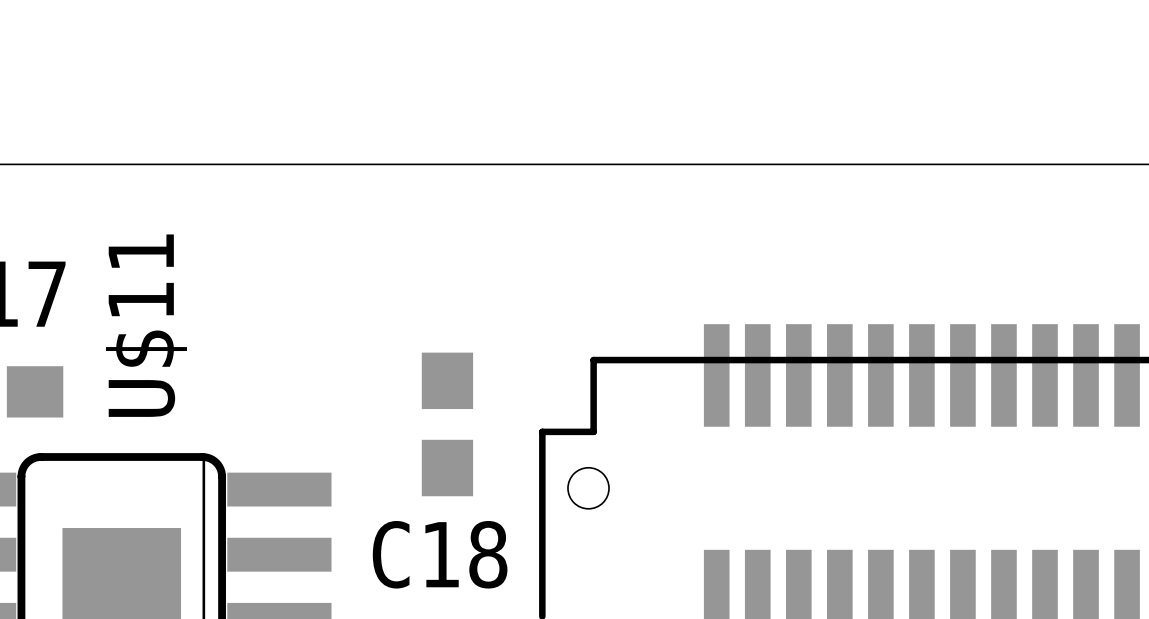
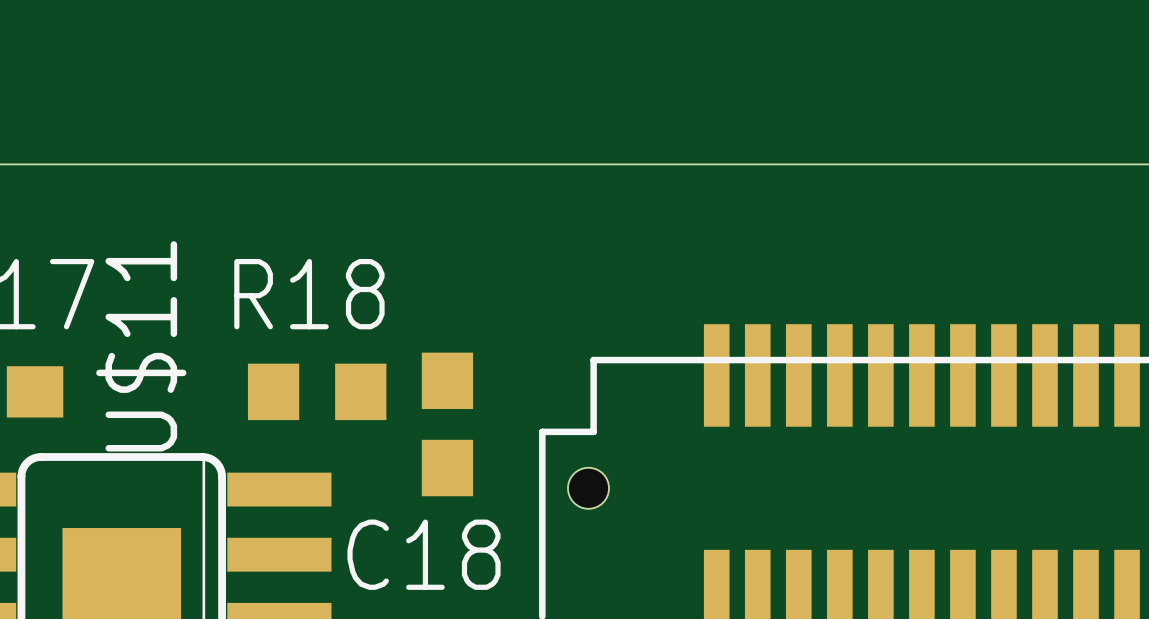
R18: none -> (317, 391)

